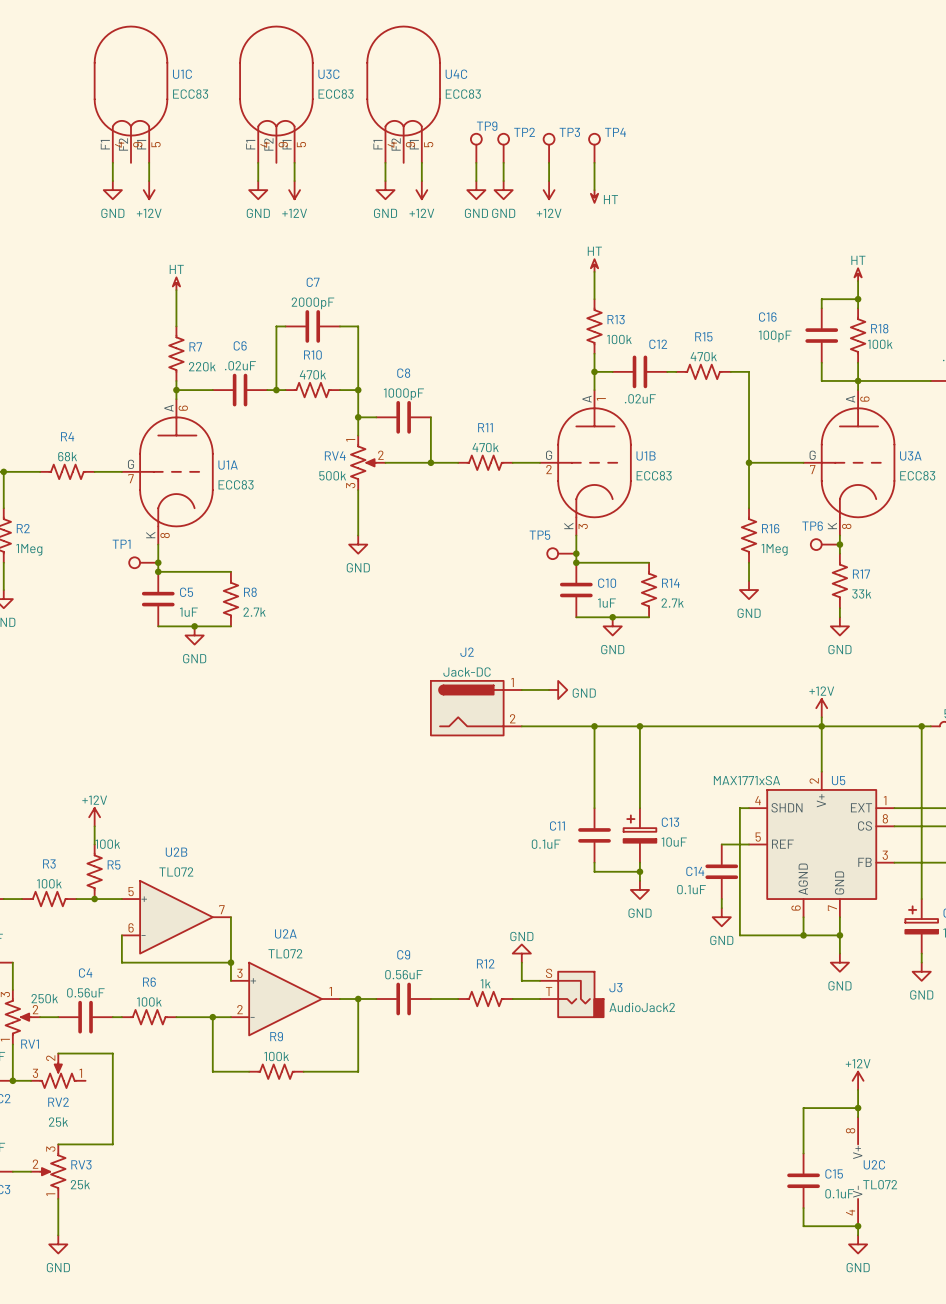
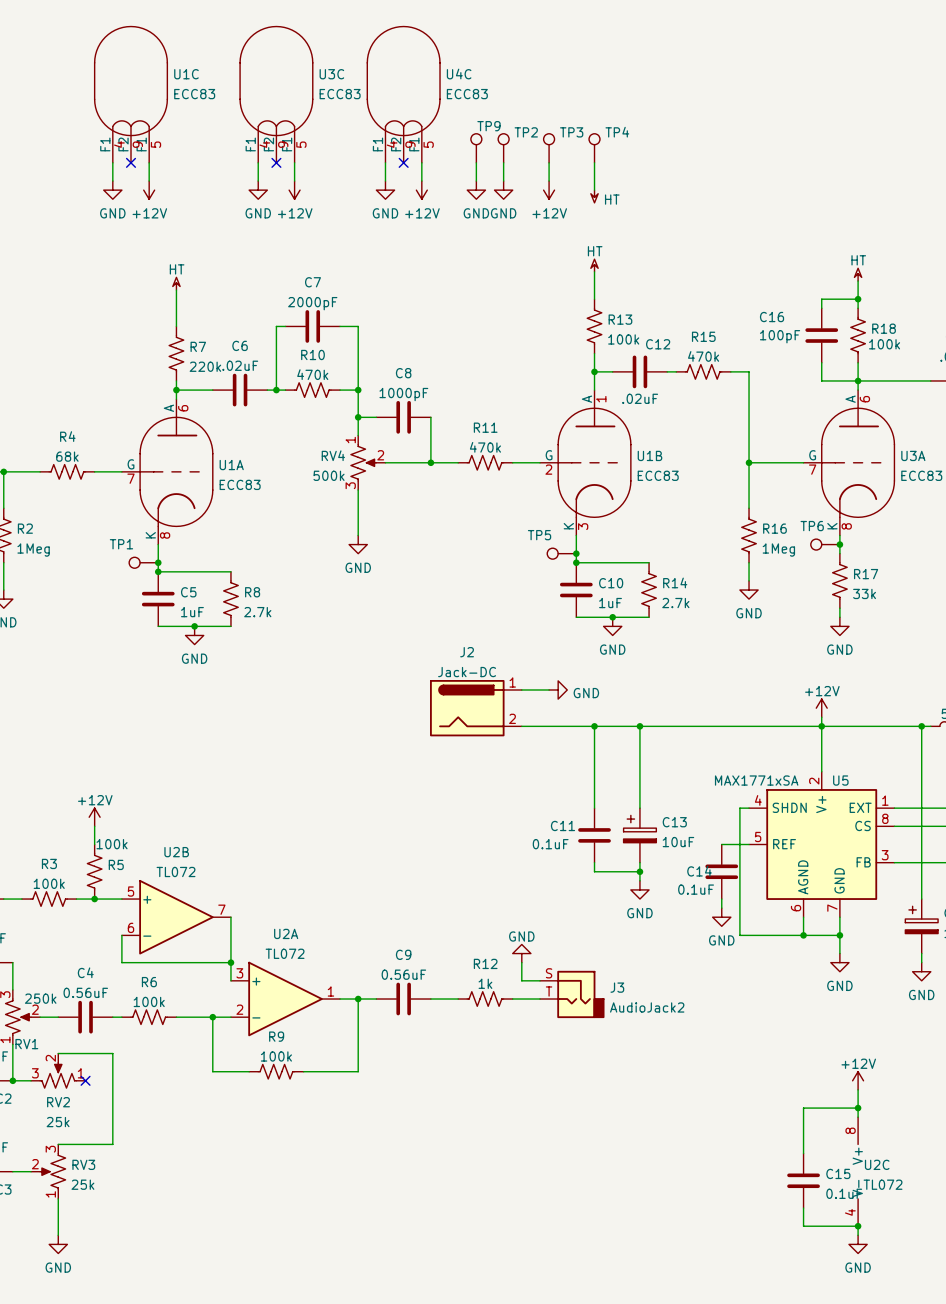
no-connect mark: none -> (131, 162)
no-connect mark: none -> (276, 162)
no-connect mark: none -> (403, 162)
no-connect mark: none -> (85, 1080)

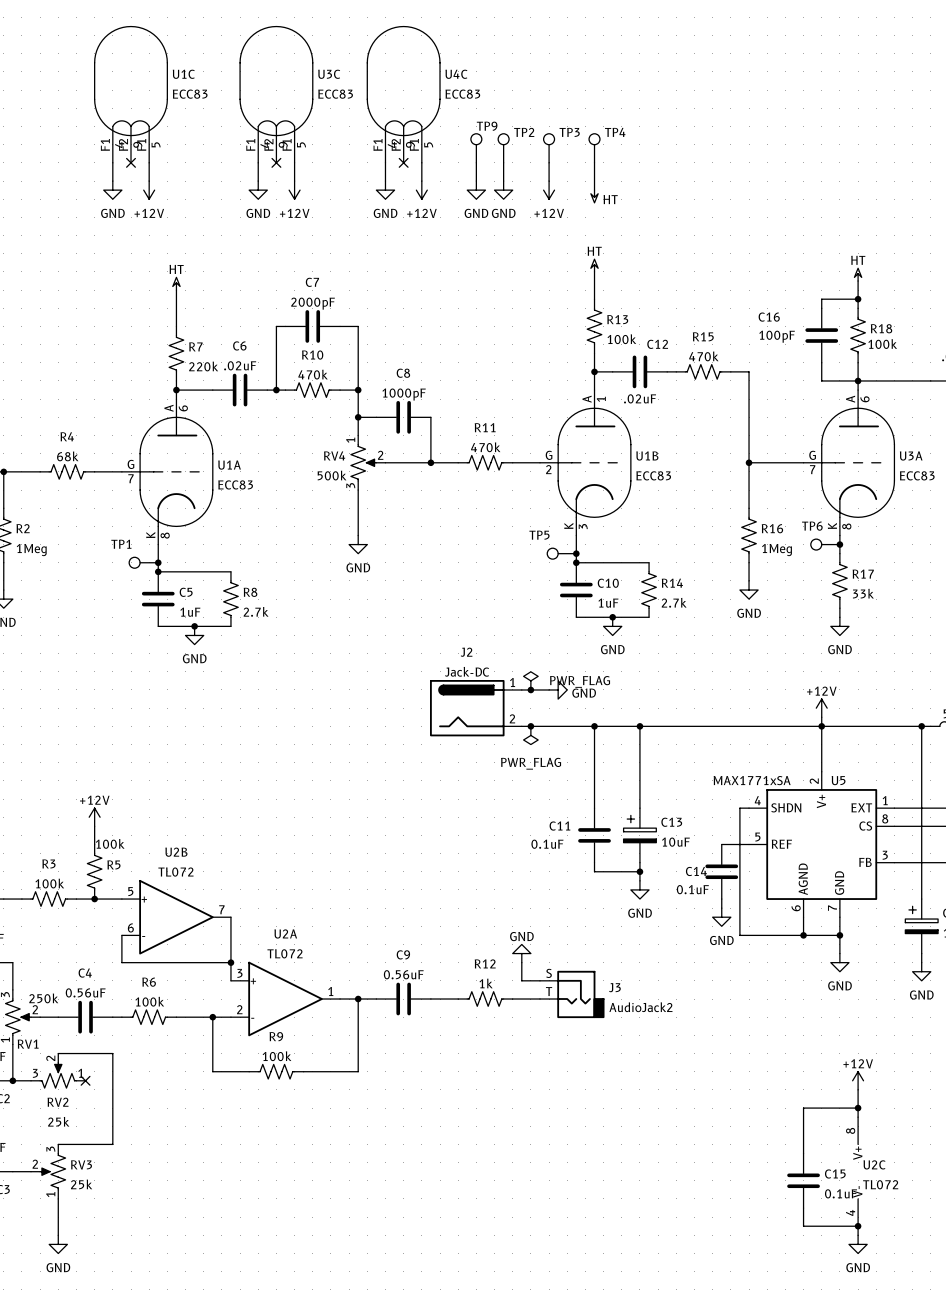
power symbol: none -> PWR_FLAG (530, 680)
junction: none -> (530, 689)
junction: none -> (530, 726)
power symbol: none -> PWR_FLAG (530, 735)

